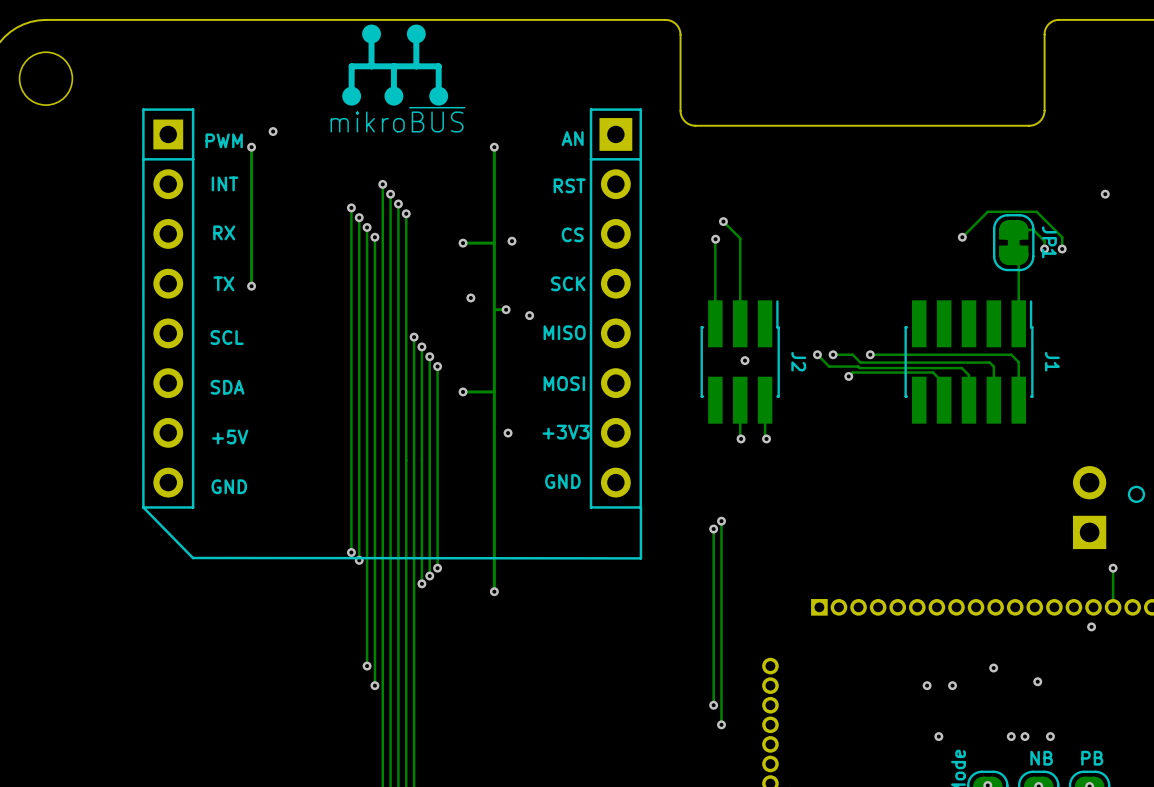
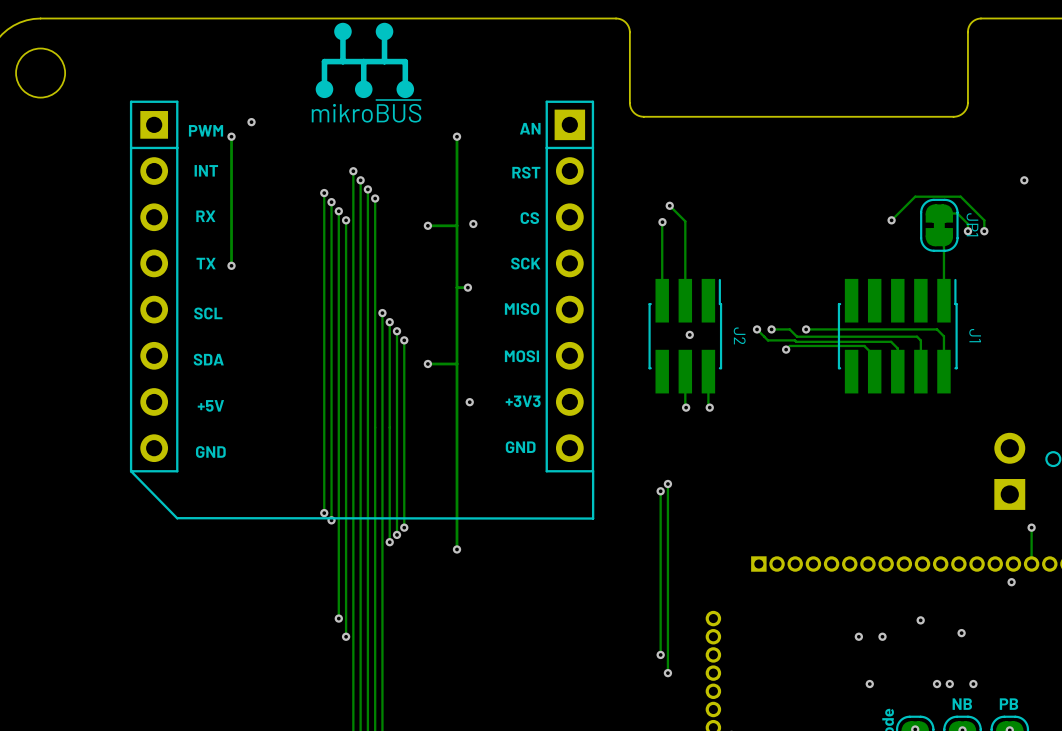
via: (470, 297) -> none
via: (529, 315) -> none

